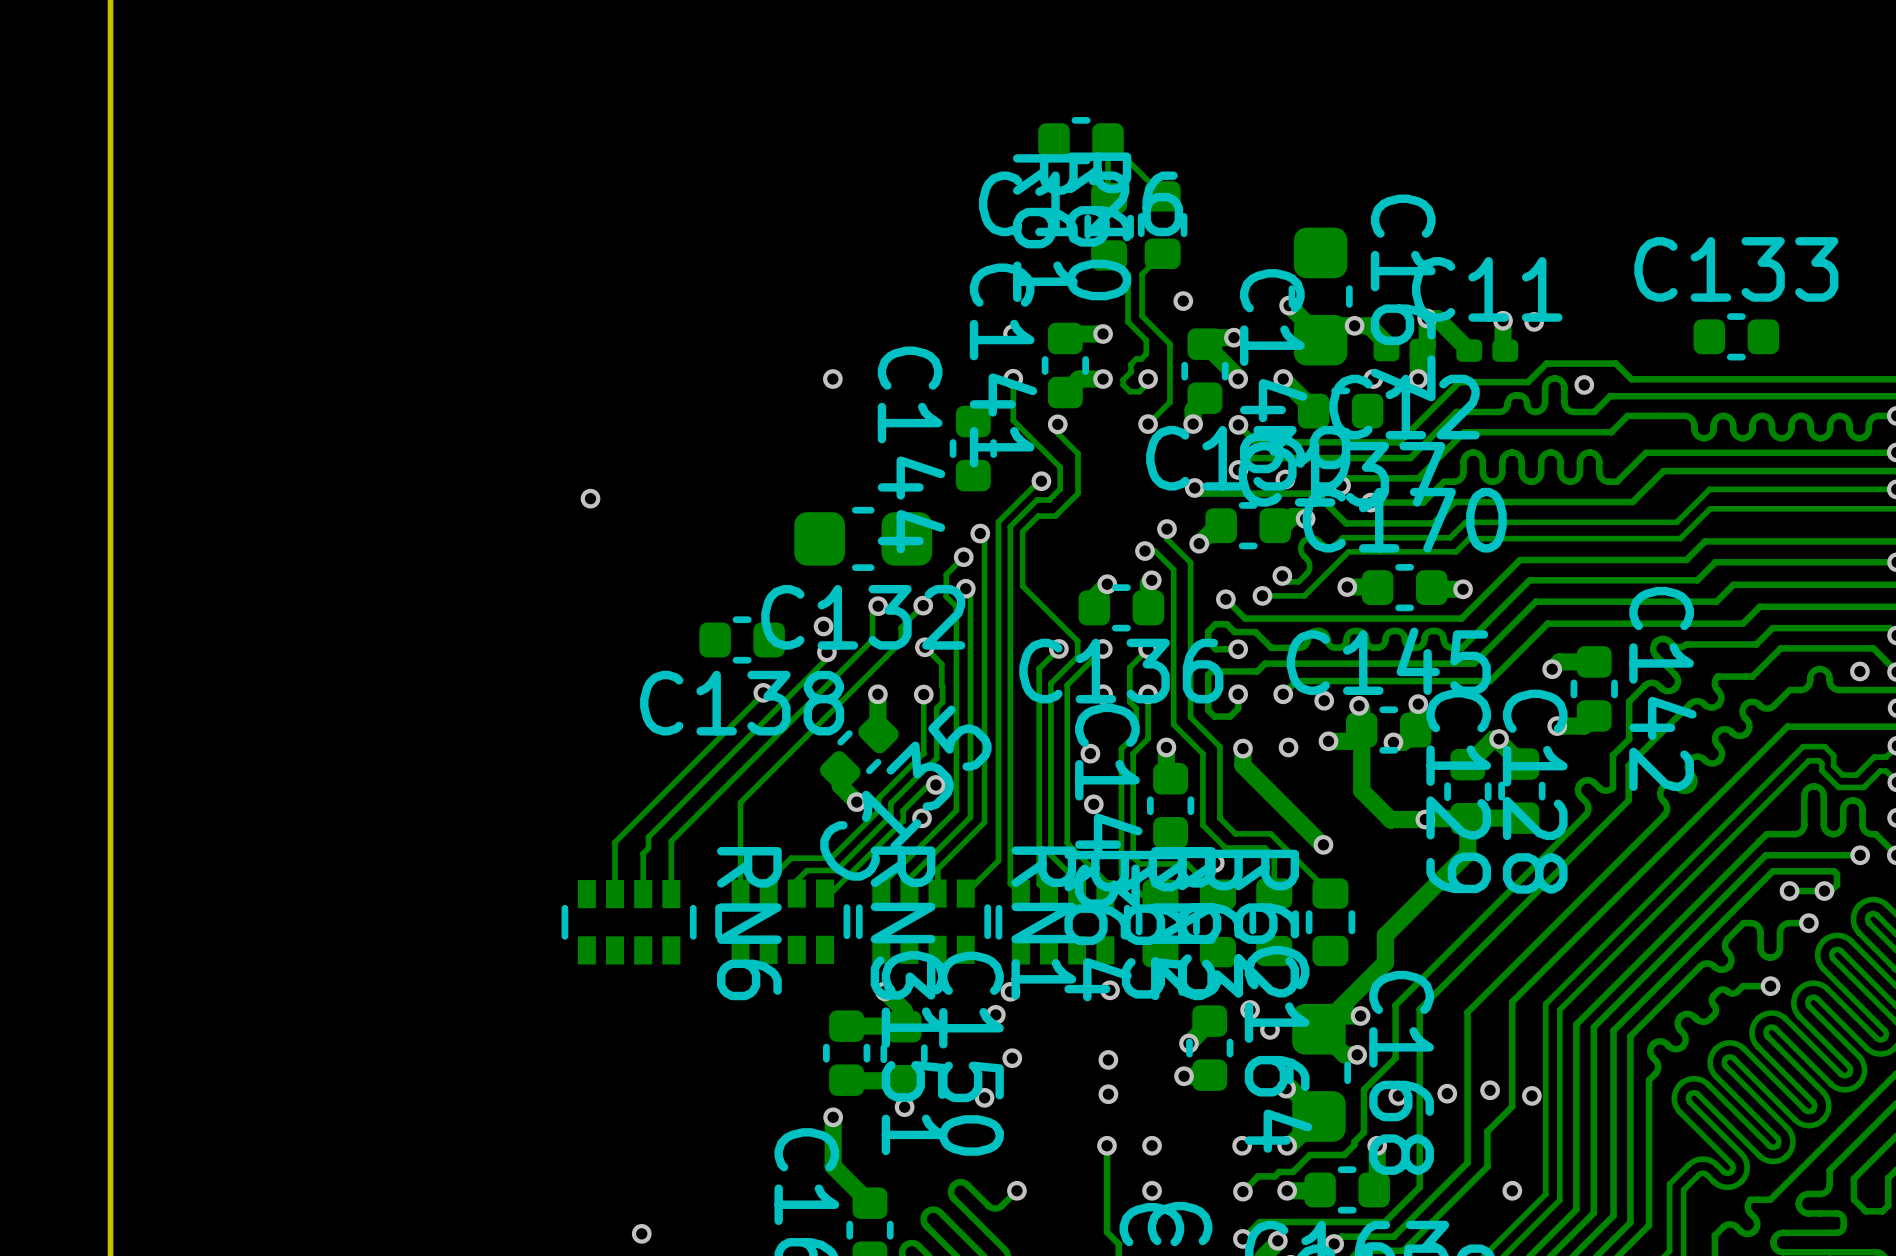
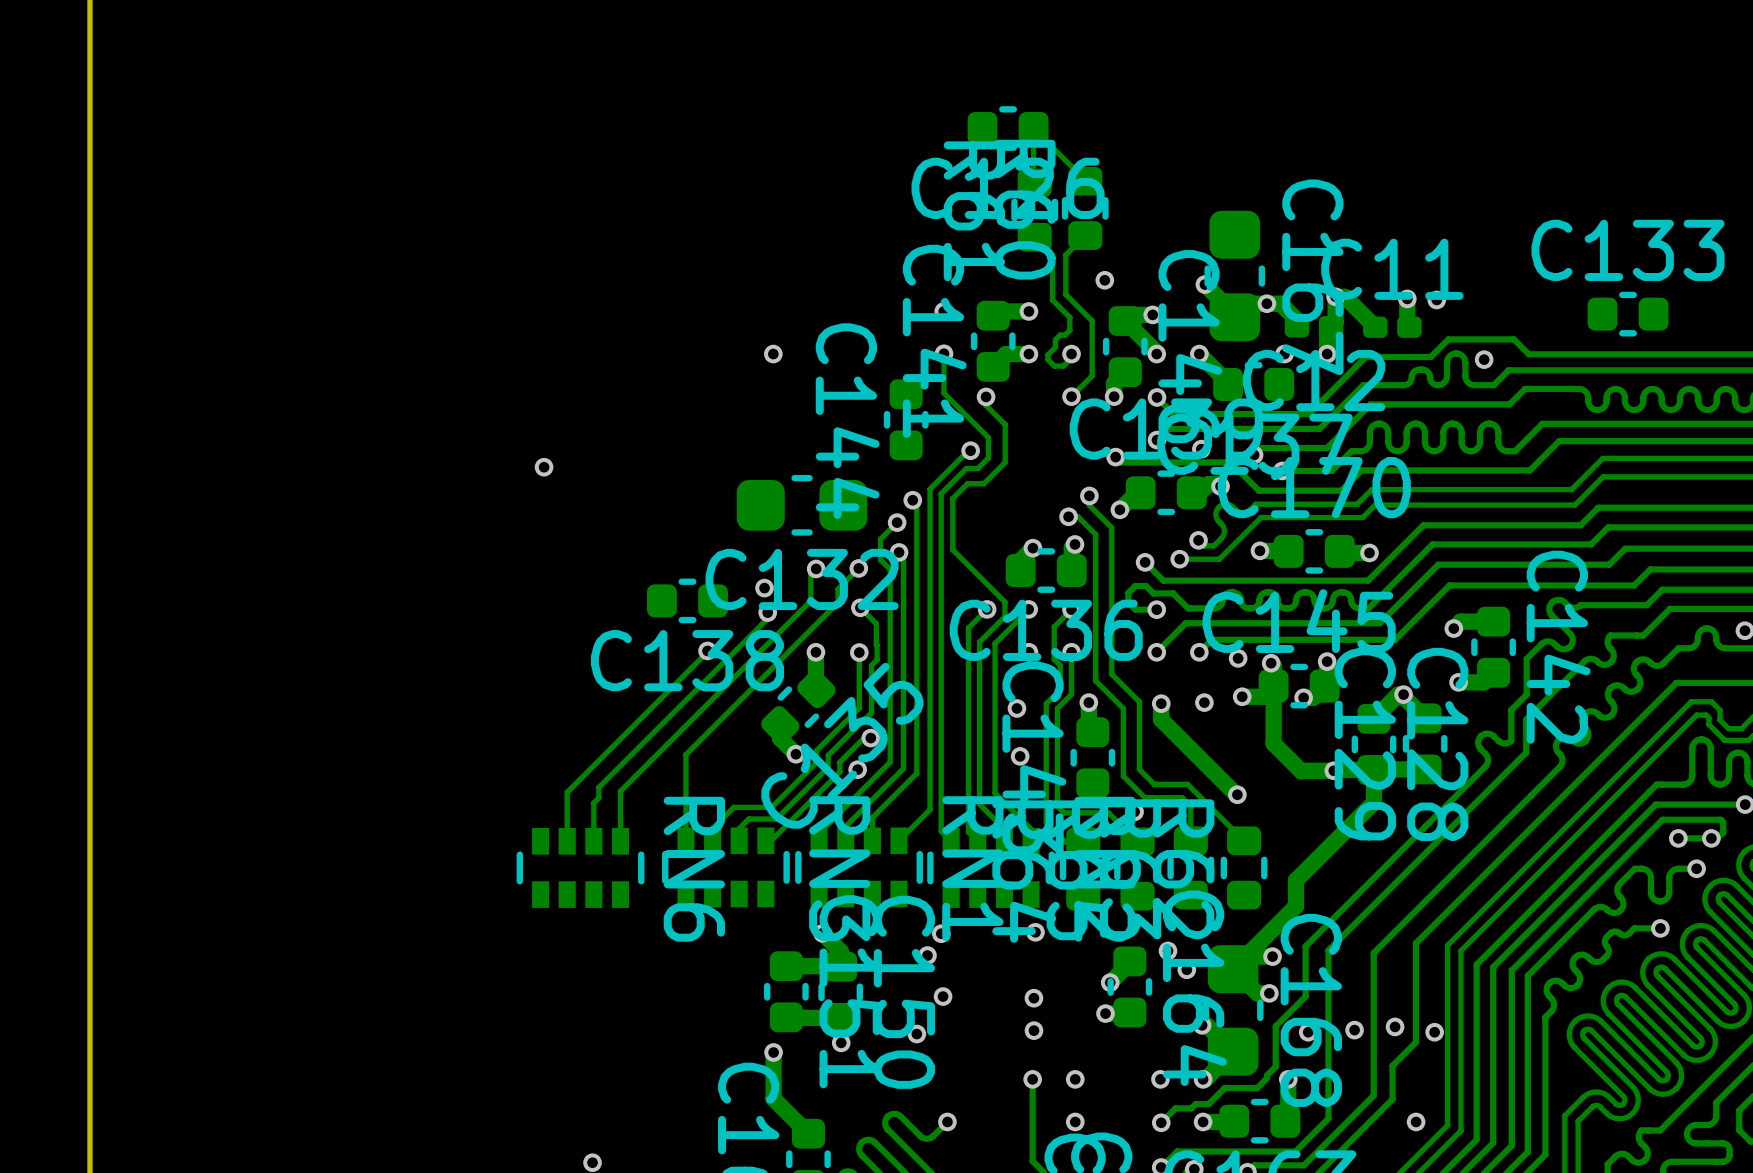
track: (1268, 663) (1265, 663) (1257, 671) (1211, 671) (1208, 674) (1208, 710) (1214, 716) (1230, 716) (1238, 708) (1238, 694) -> (1185, 623) (1156, 652)

